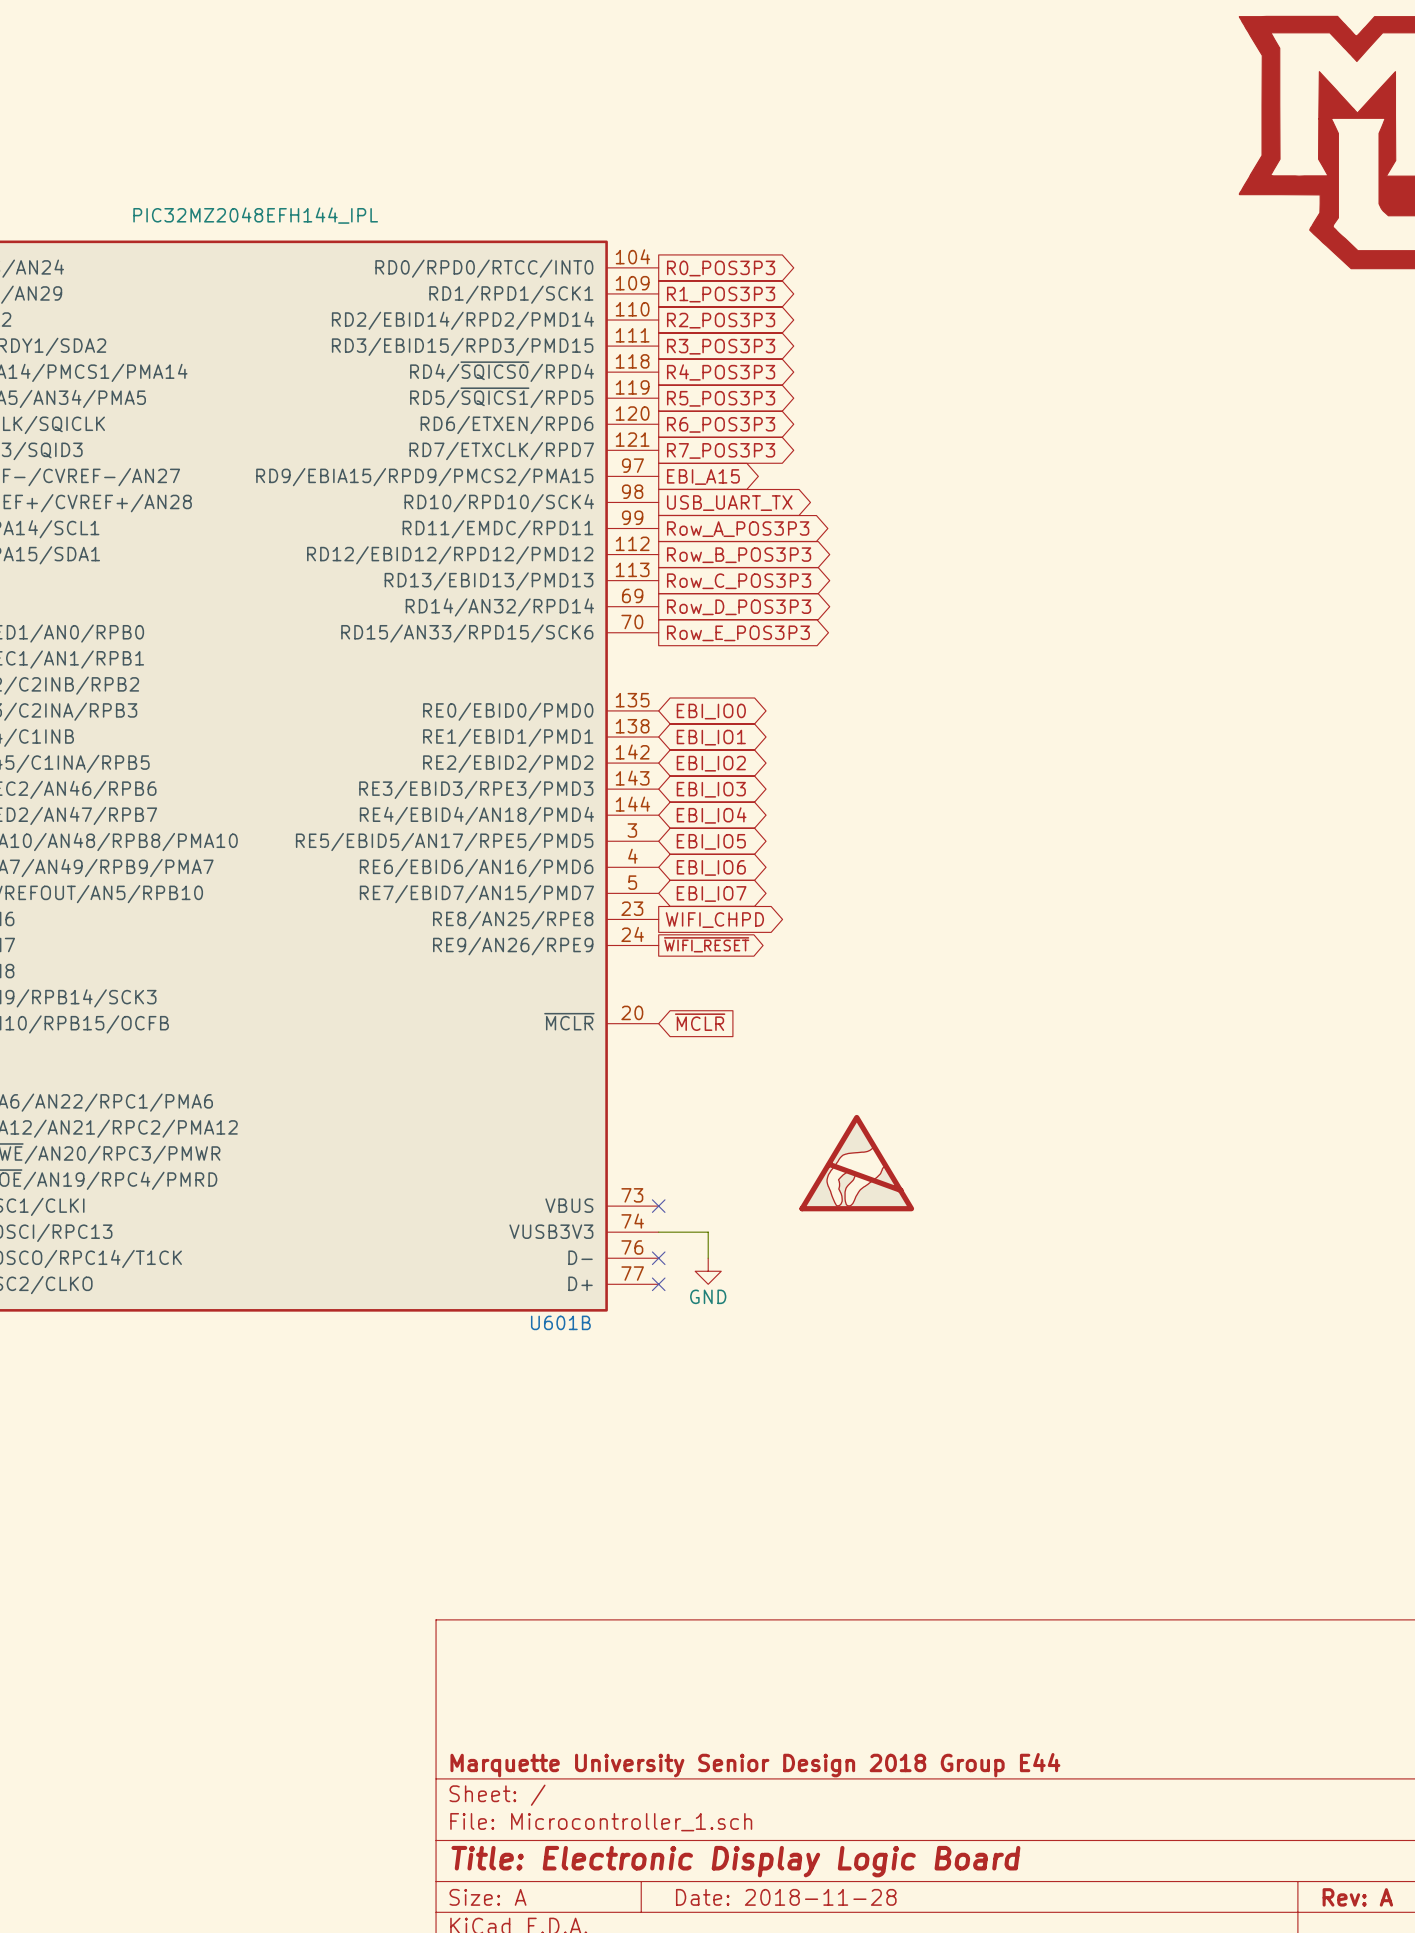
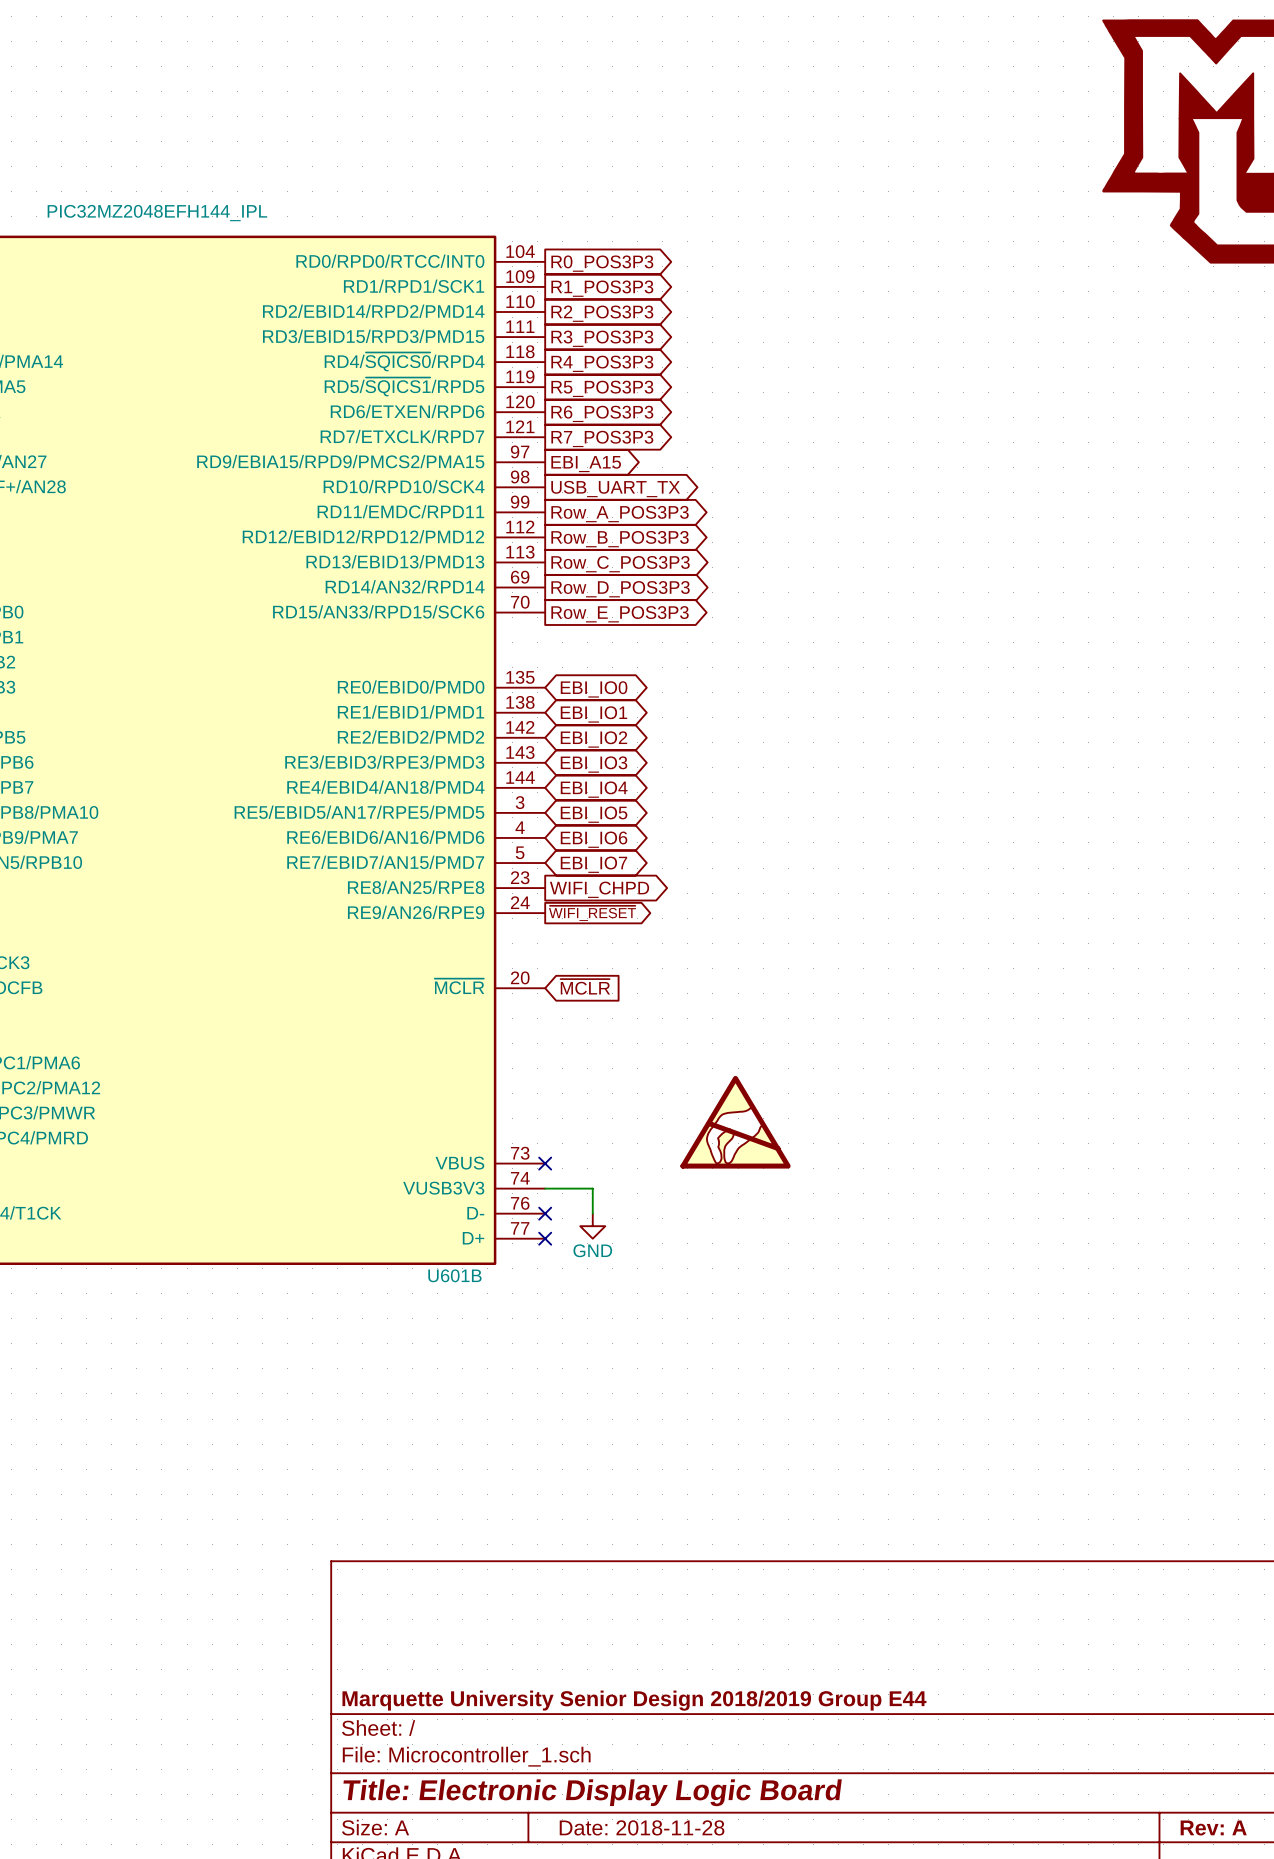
title block: Marquette University Senior Design 2018 Group E44 (755, 1765) -> Marquette University Senior Design 2018/2019 Group E44 (634, 1700)

